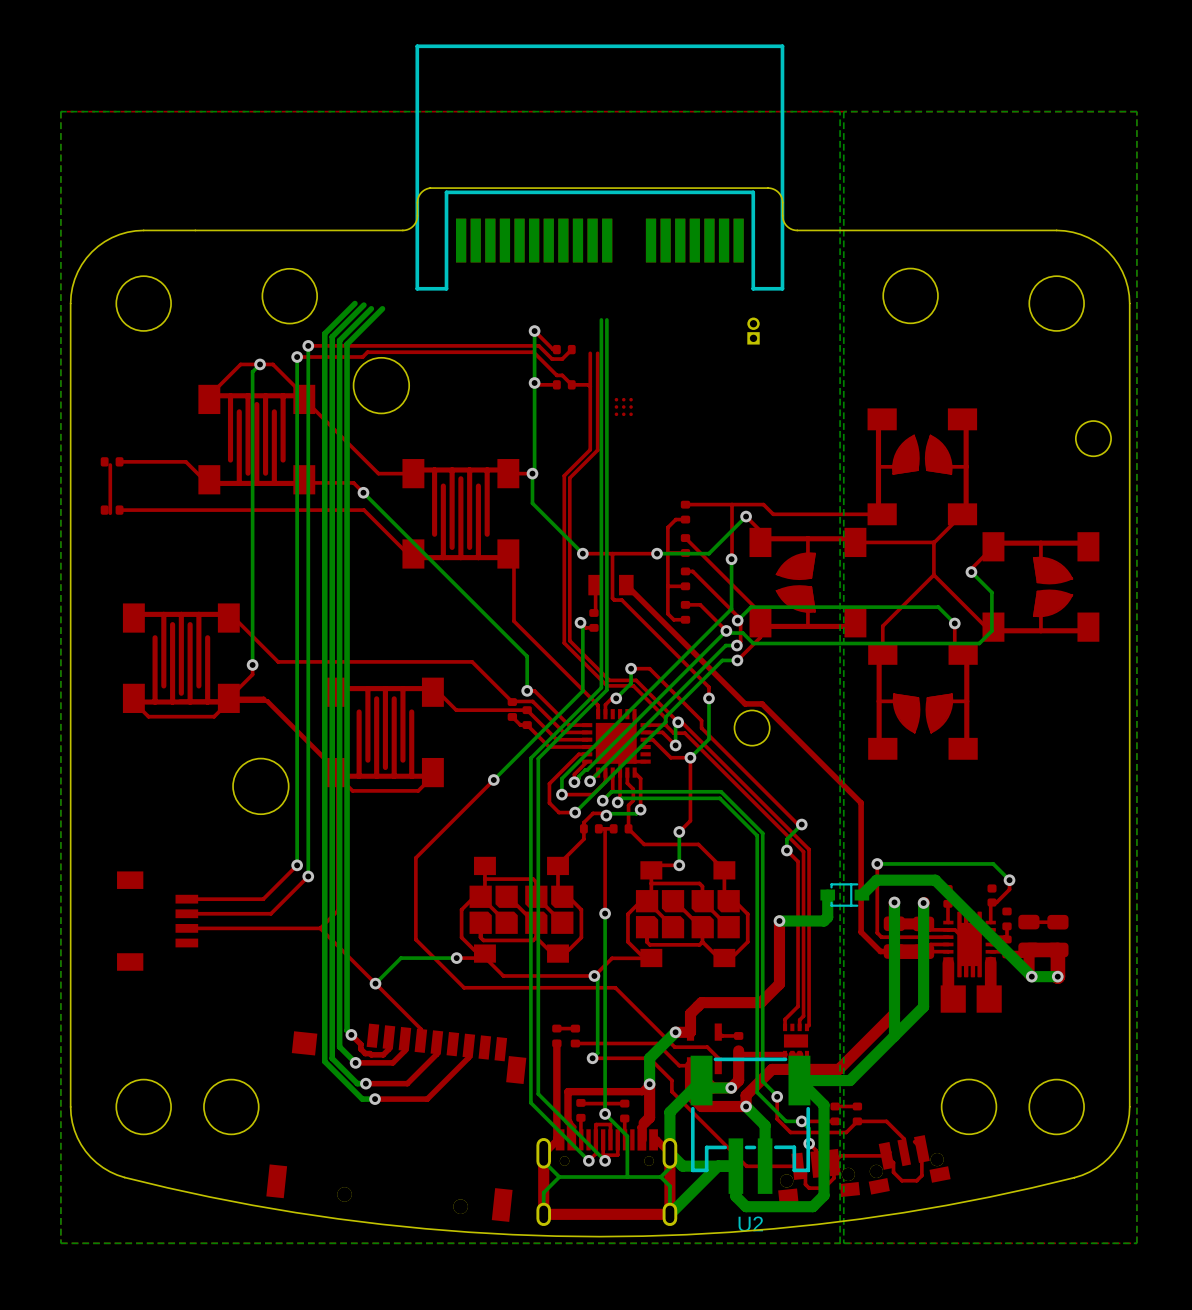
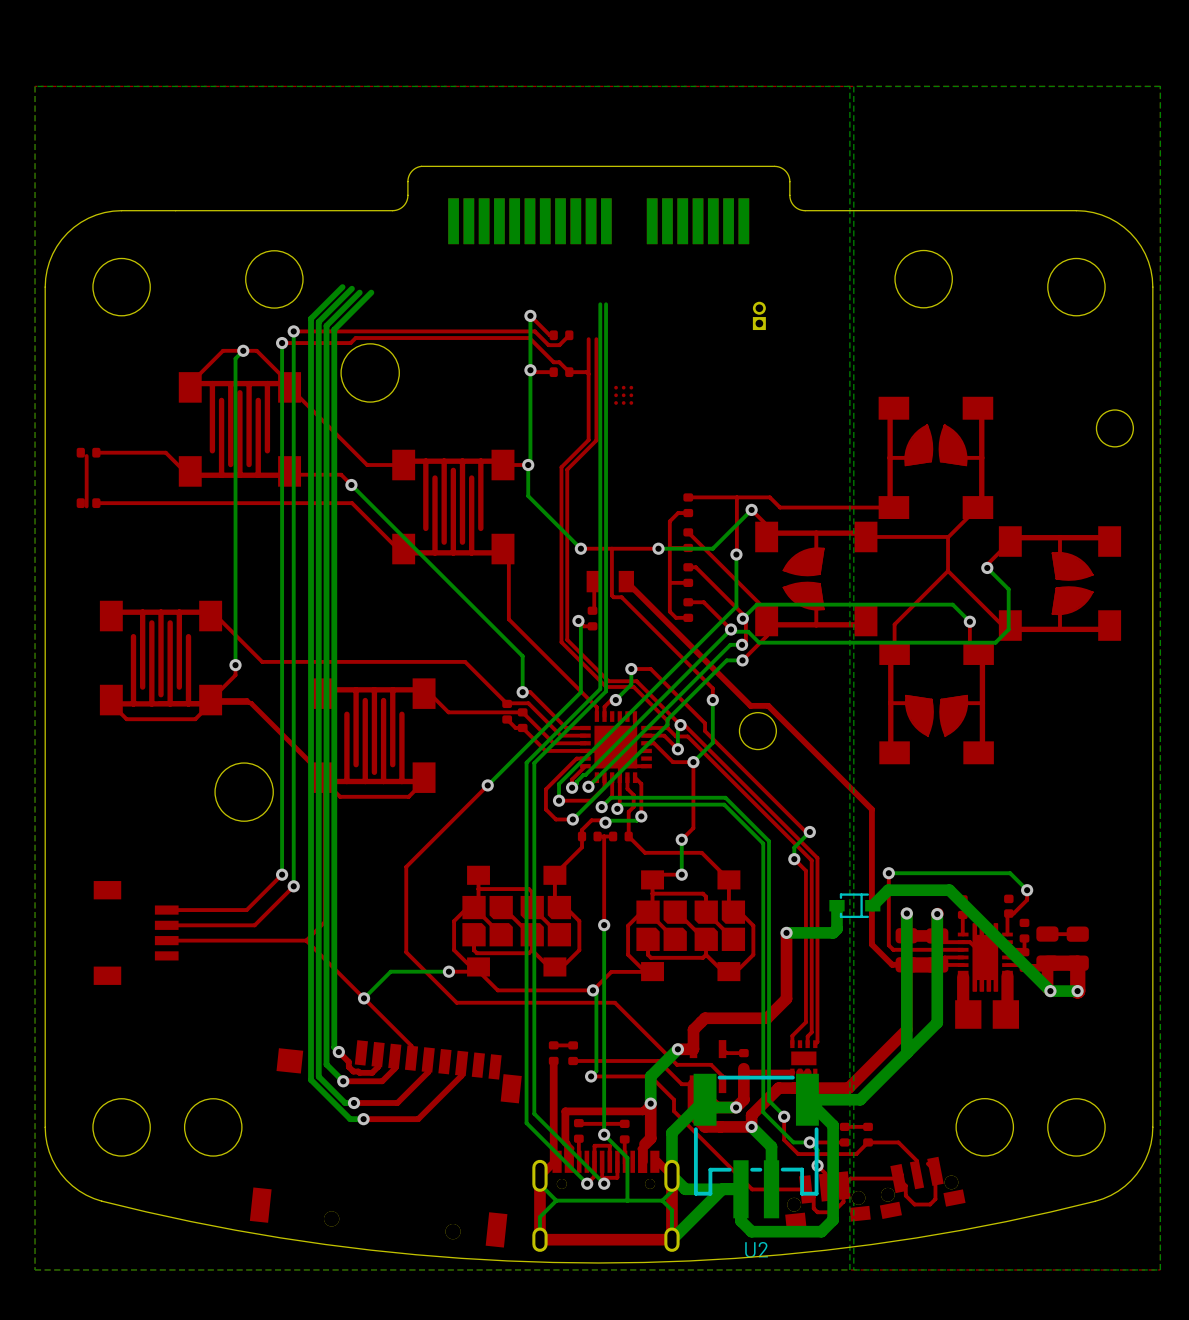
part side: bottom (599, 167) -> top (598, 221)

